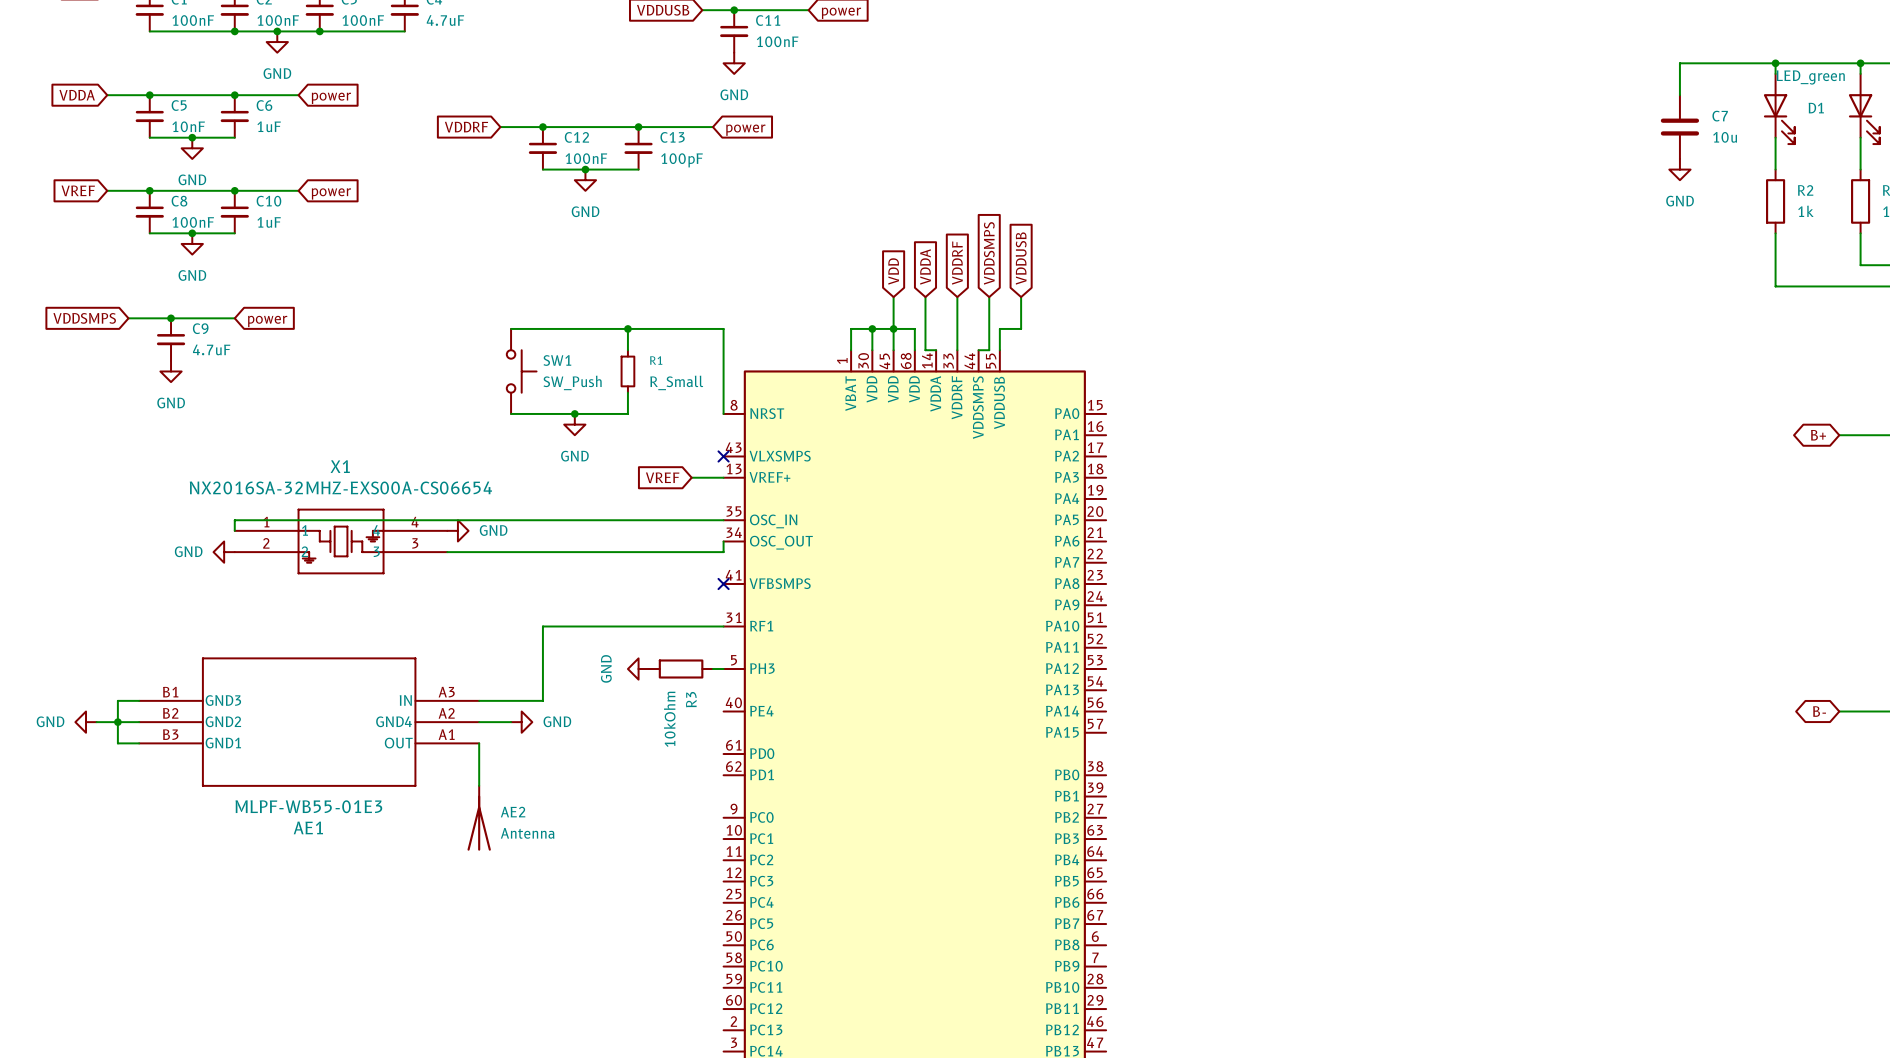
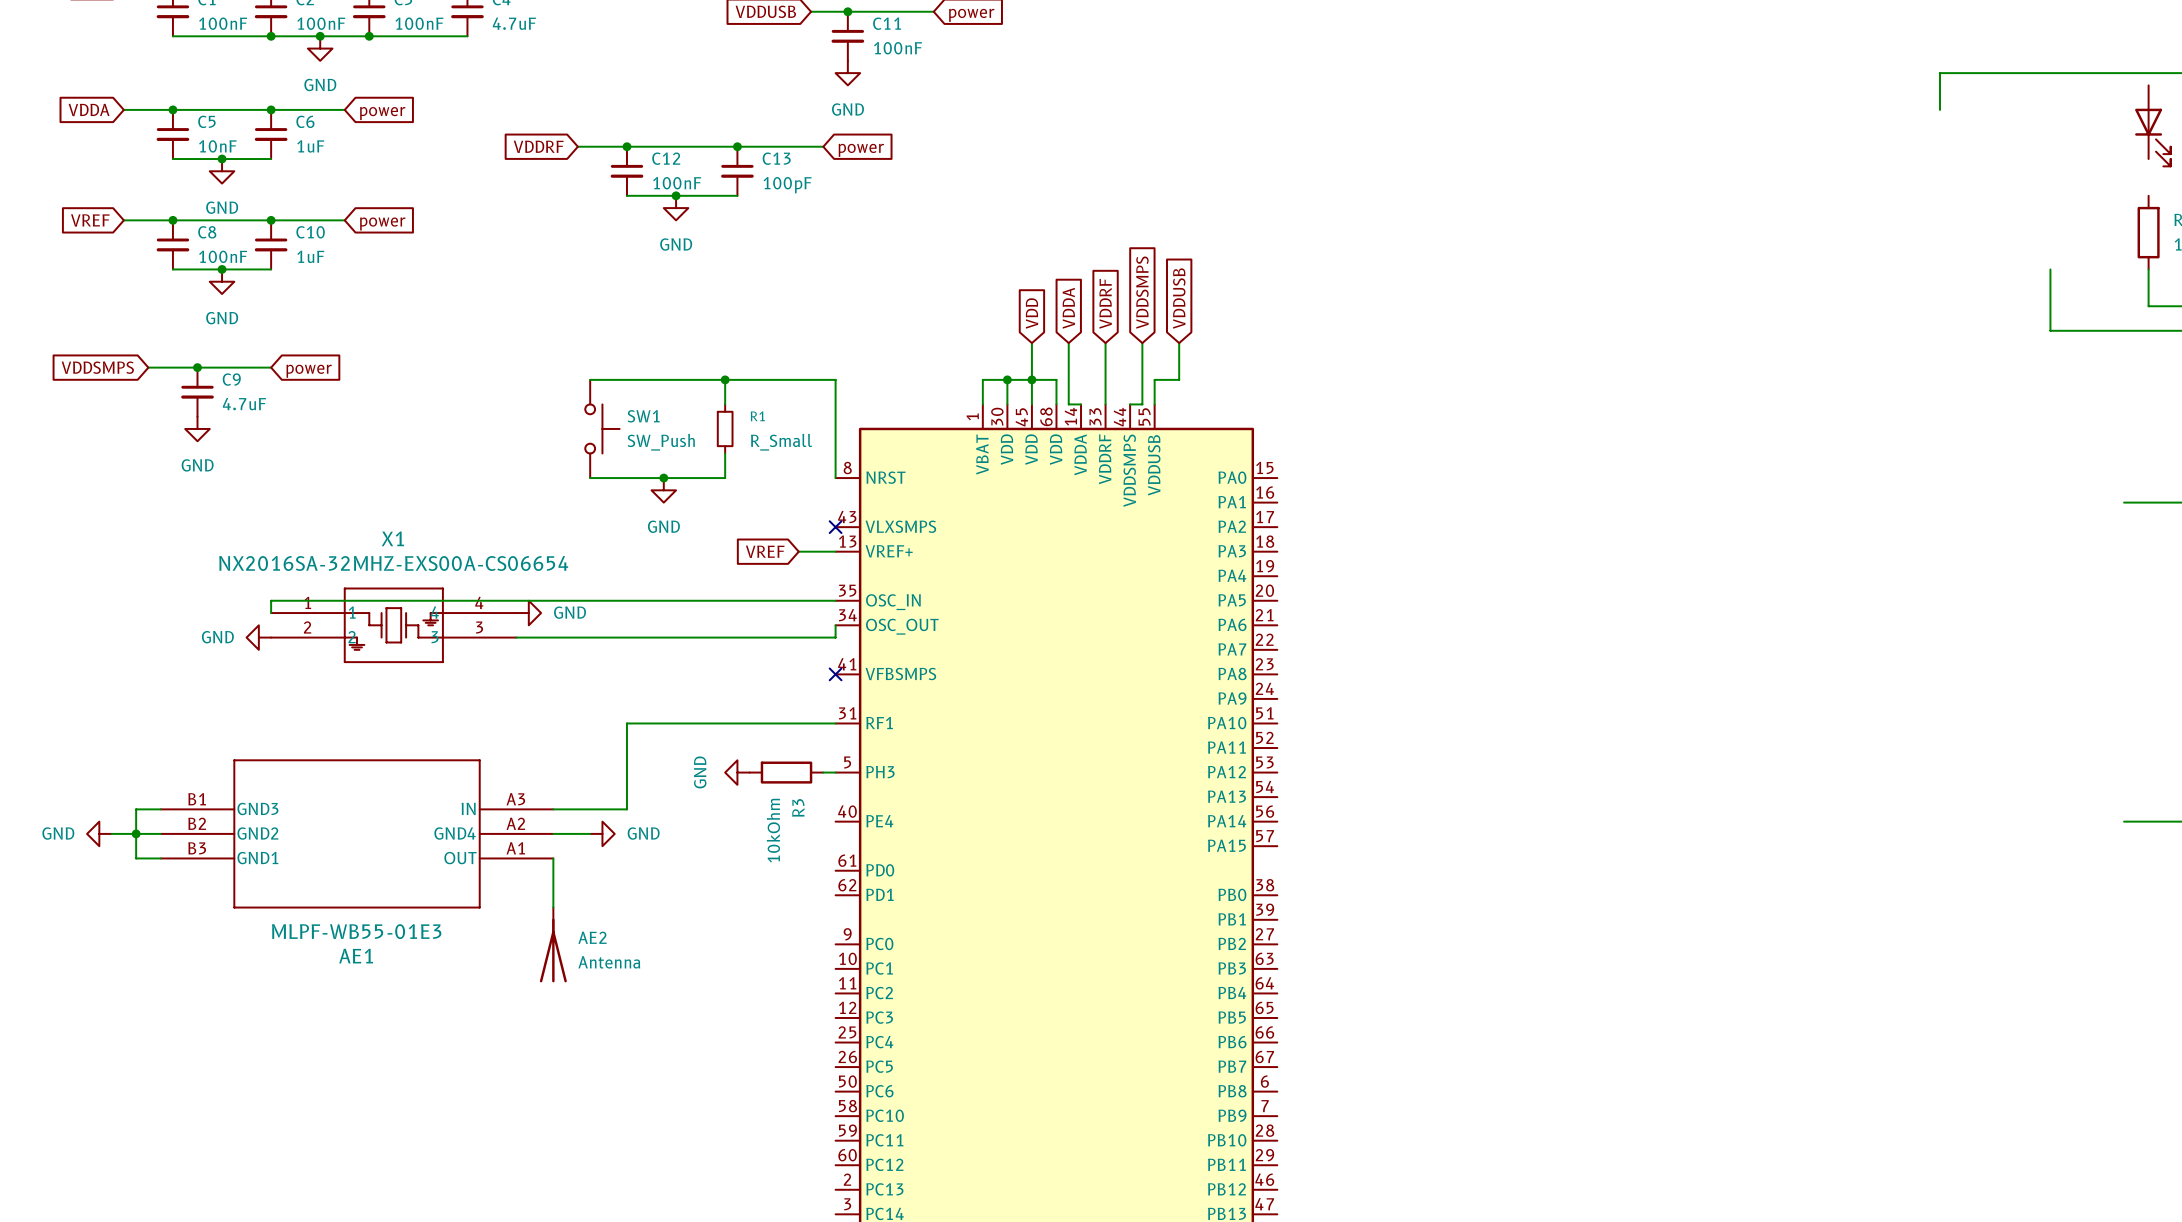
wire: (1775, 63) (1775, 73) -> none
junction: (1775, 63) -> none
wire: (1860, 63) (1860, 73) -> none
junction: (1860, 63) -> none
D1: LED_green (1779, 109) -> none
C7: 10u (1679, 127) -> none
wire: (1775, 137) (1775, 169) -> none
wire: (1860, 137) (1860, 169) -> none
power symbol: GND (1679, 169) -> none
R2: 1k (1775, 201) -> none
global label: B+ (1818, 435) -> none
global label: B- (1819, 711) -> none

